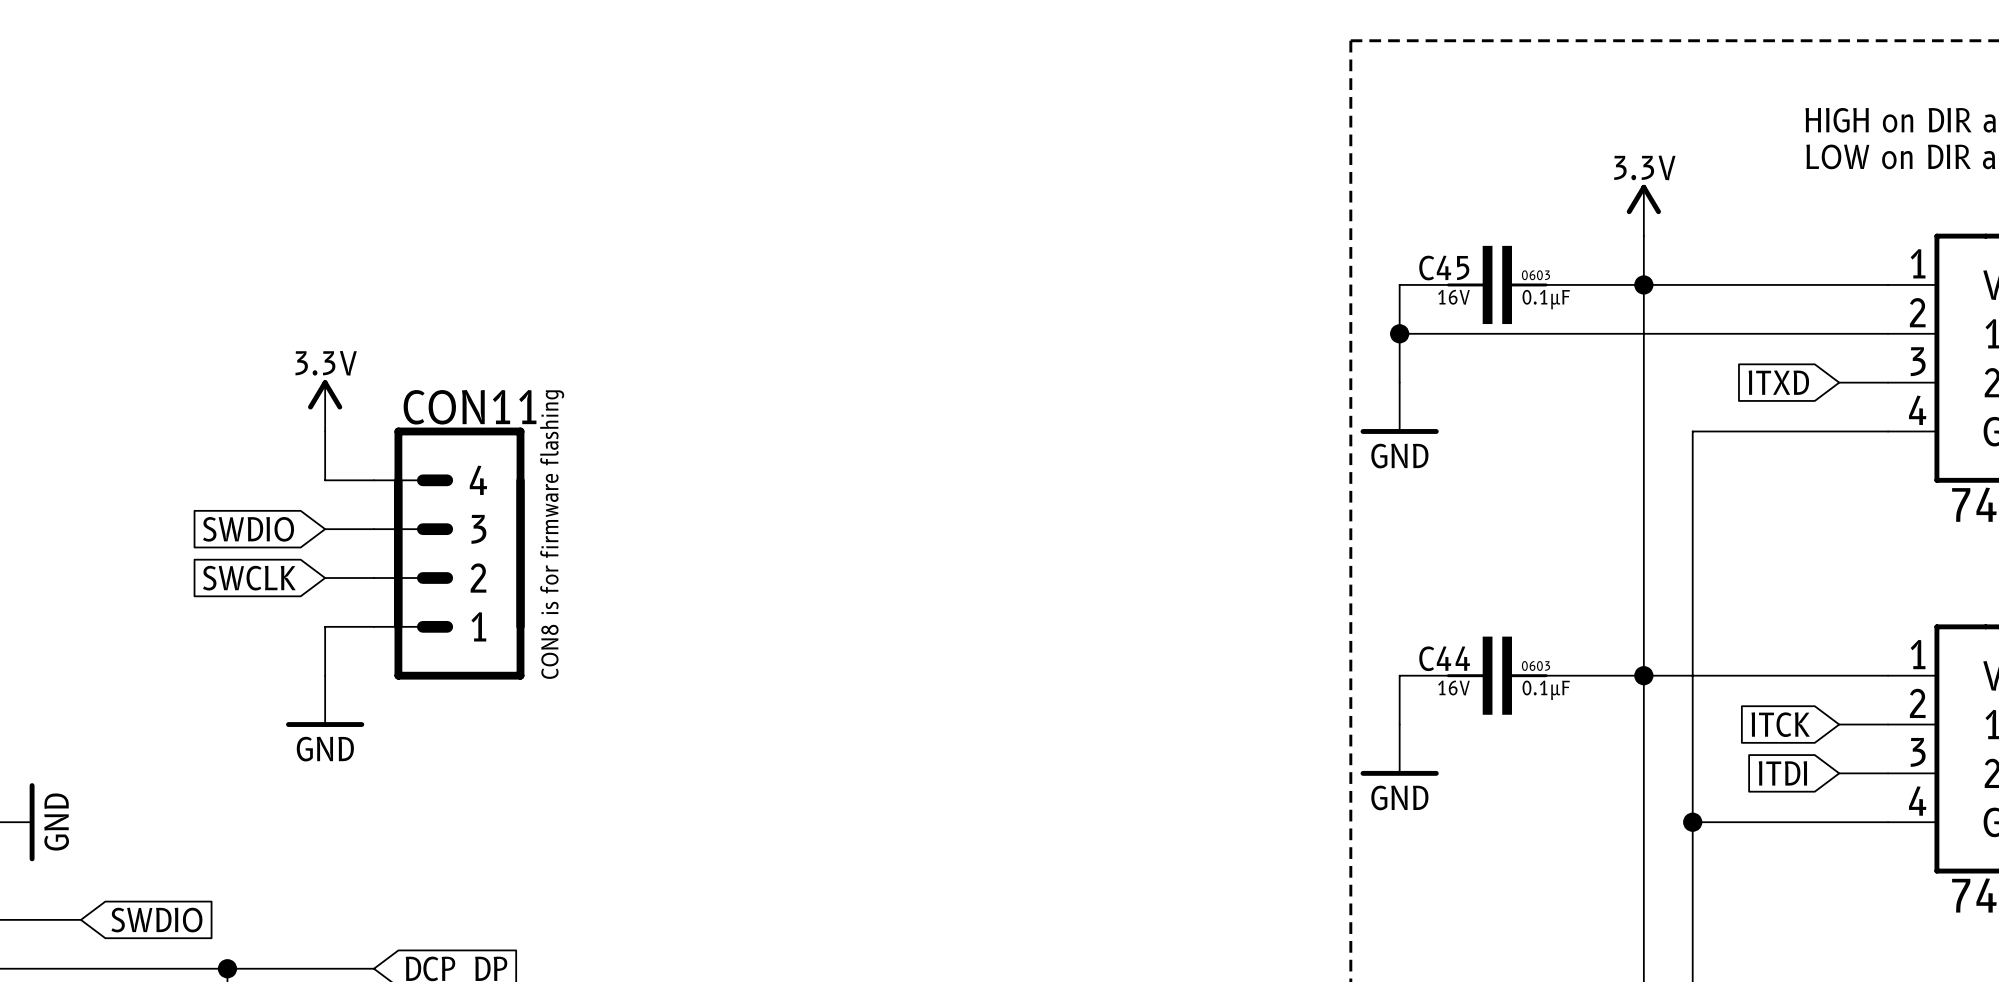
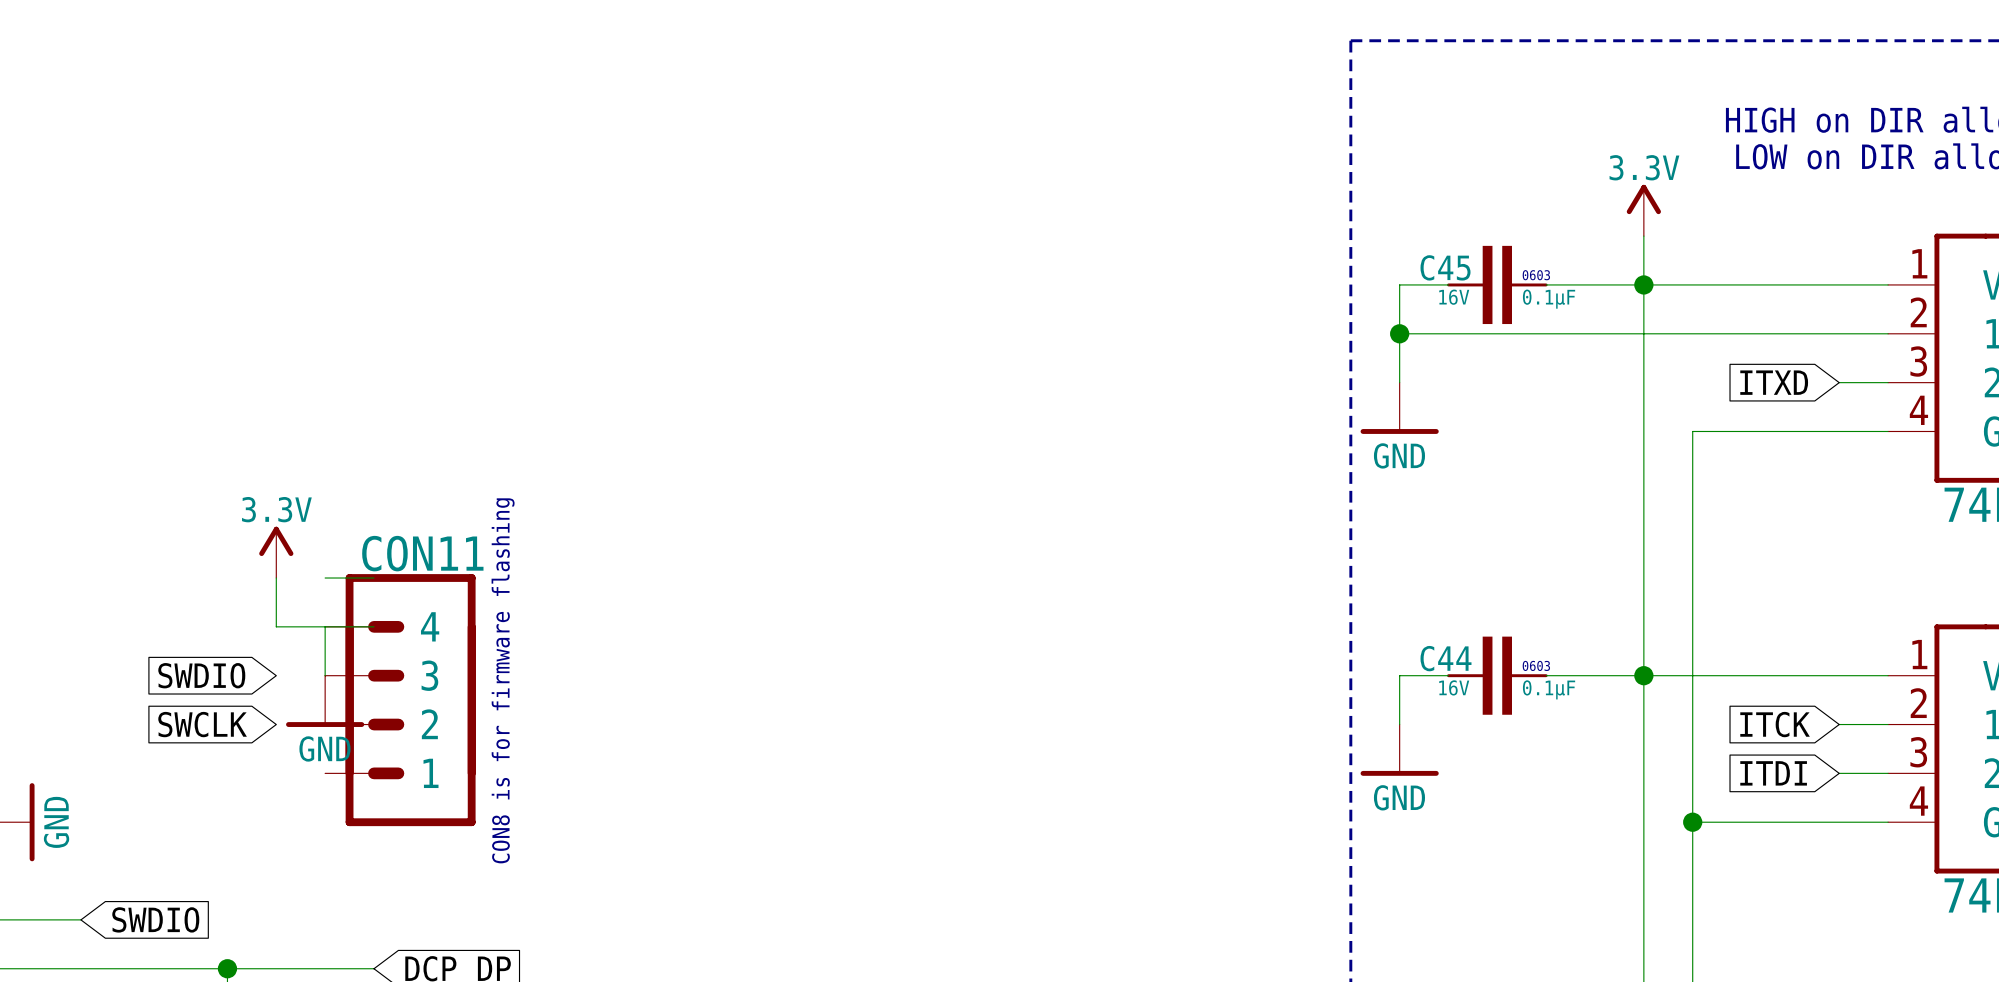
power symbol position: 3.3V (325, 405) -> 3.3V (276, 552)
wire: (325, 431) (325, 480) (373, 480) -> (276, 578) (276, 626) (325, 626)
global label position: SWDIO (248, 529) -> SWDIO (201, 675)
wire: (325, 529) (373, 529) -> none
text position: CON8 is for firmware flashing (552, 534) -> CON8 is for firmware flashing (503, 680)
CON11 position: (449, 553) -> (400, 700)
global label position: SWCLK (249, 578) -> SWCLK (202, 724)

